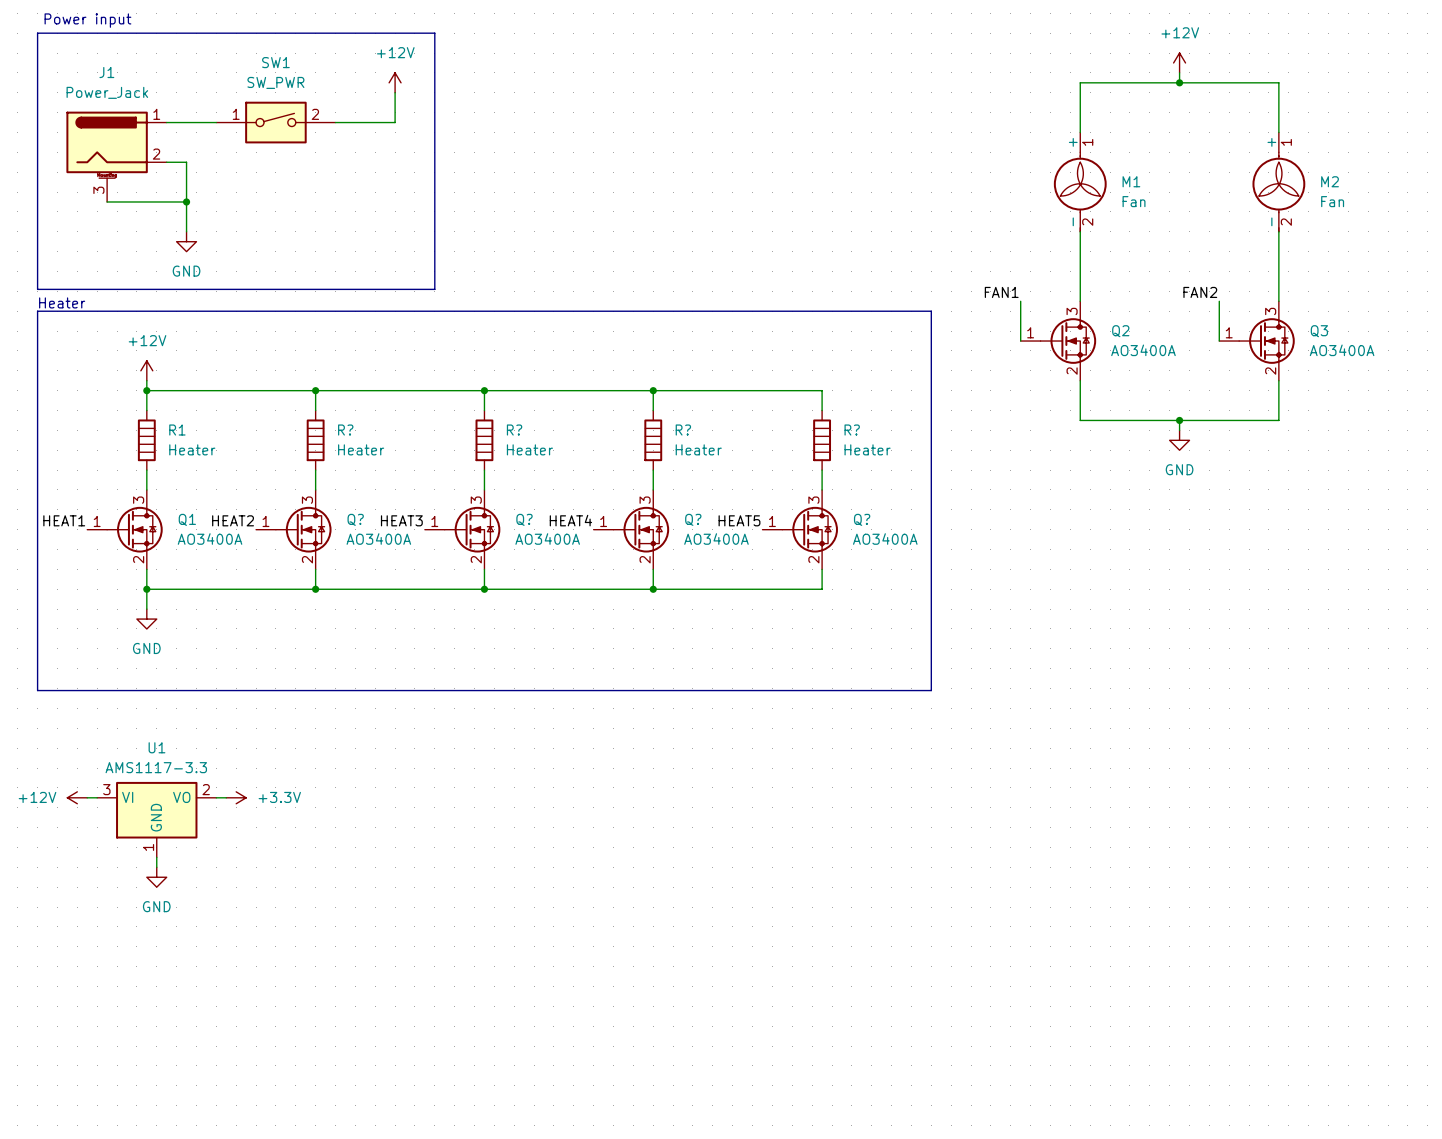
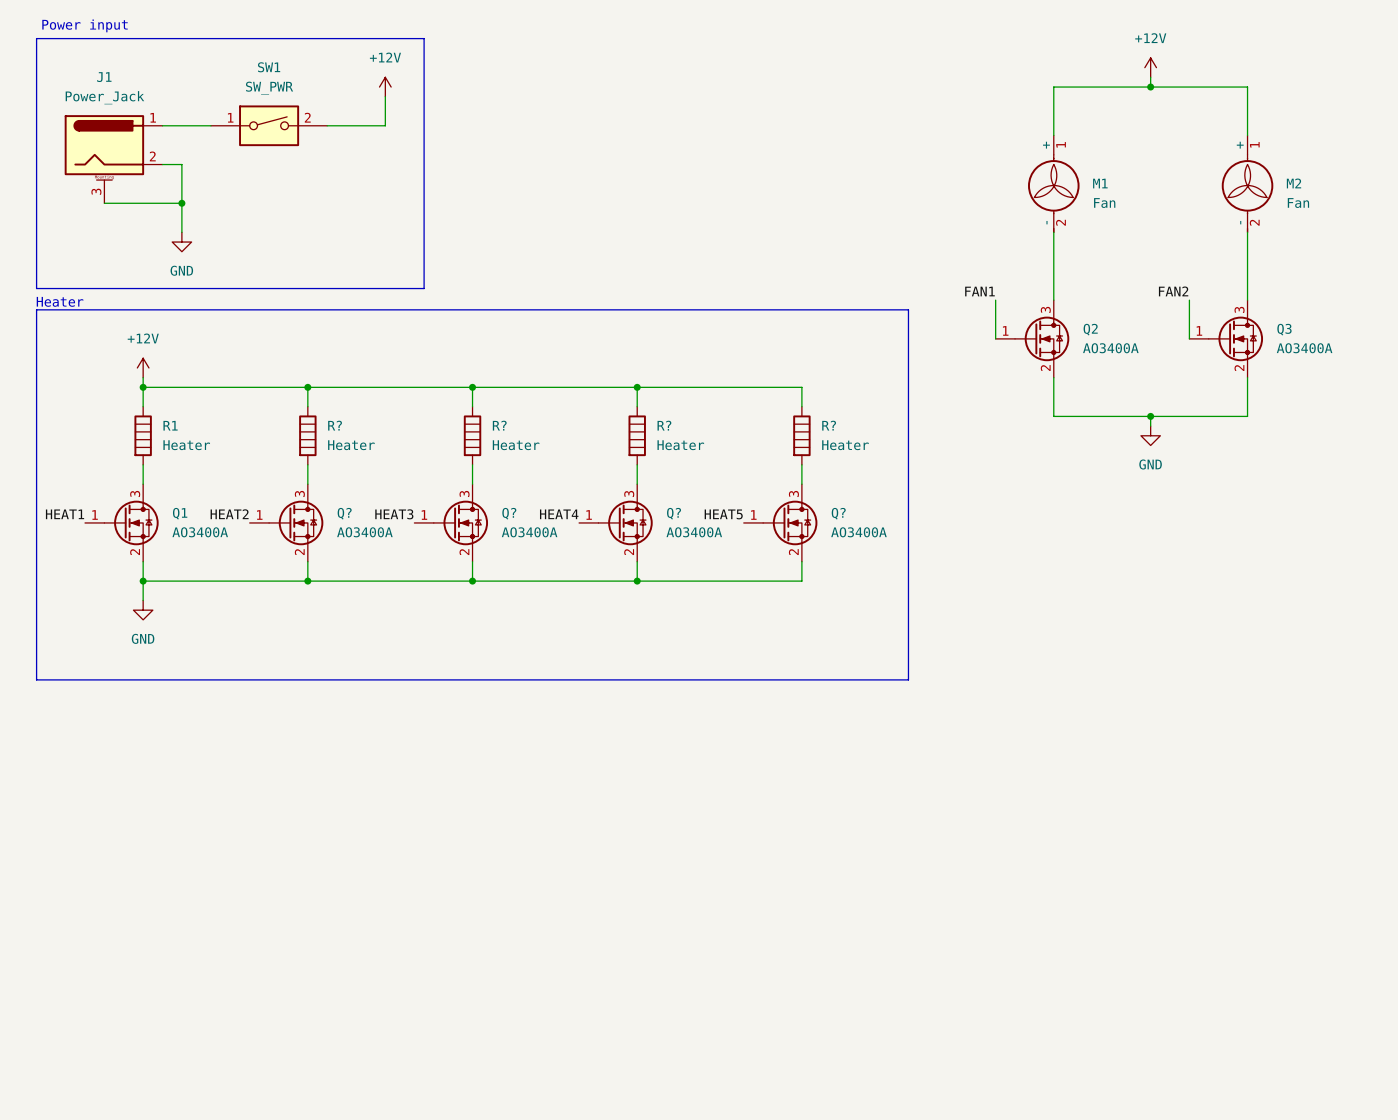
power symbol: +12V (77, 797) -> none
wire: (87, 797) (97, 797) -> none
wire: (216, 797) (226, 797) -> none
power symbol: +3.3V (236, 797) -> none
U1: AMS1117-3.3 (156, 819) -> none
wire: (156, 857) (156, 867) -> none
power symbol: GND (156, 877) -> none

